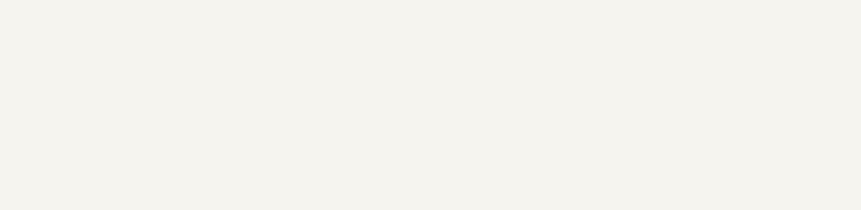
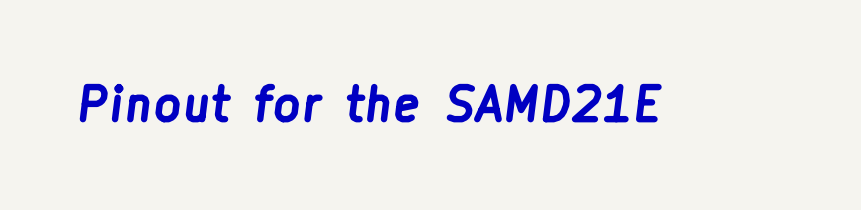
text: none -> Pinout for the SAMD21E (370, 103)

